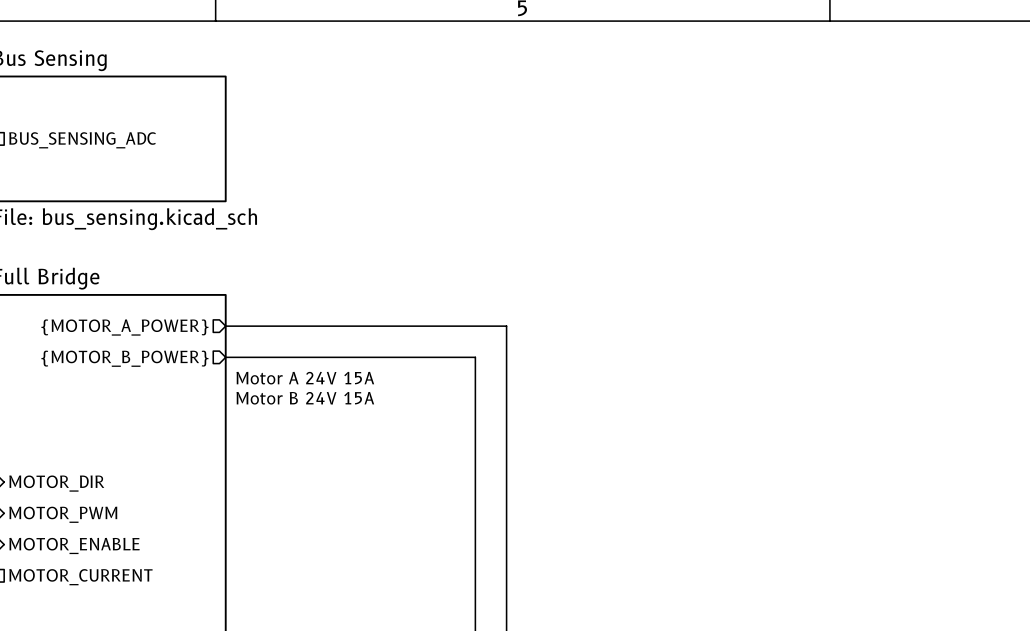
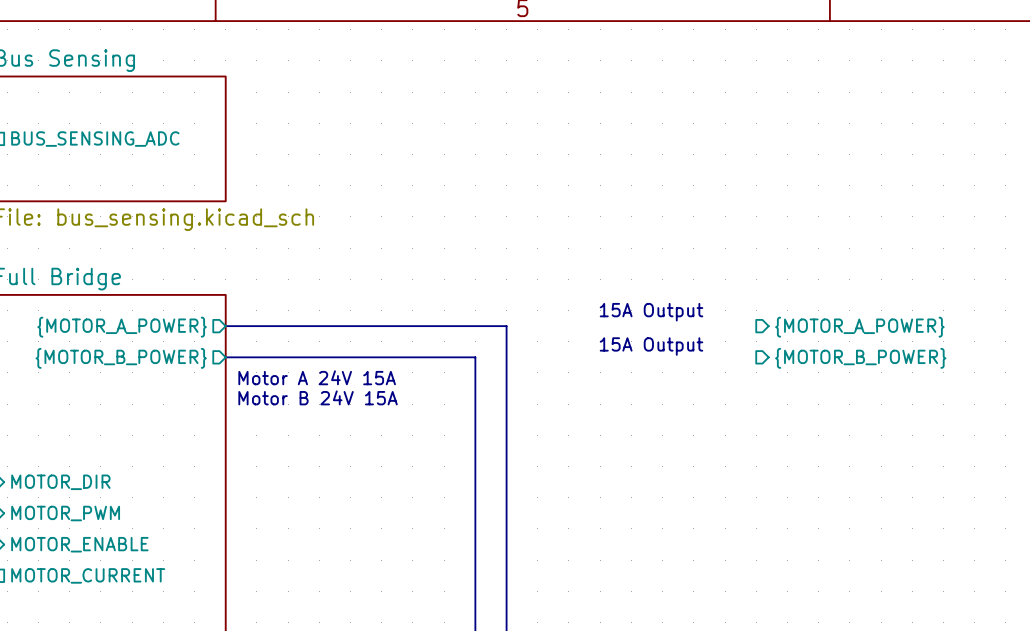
text: none -> 15A Output (651, 312)
sheet pin: none -> {MOTOR_A_POWER} (859, 327)
text: none -> 15A Output (651, 346)
sheet pin: none -> {MOTOR_B_POWER} (860, 358)

